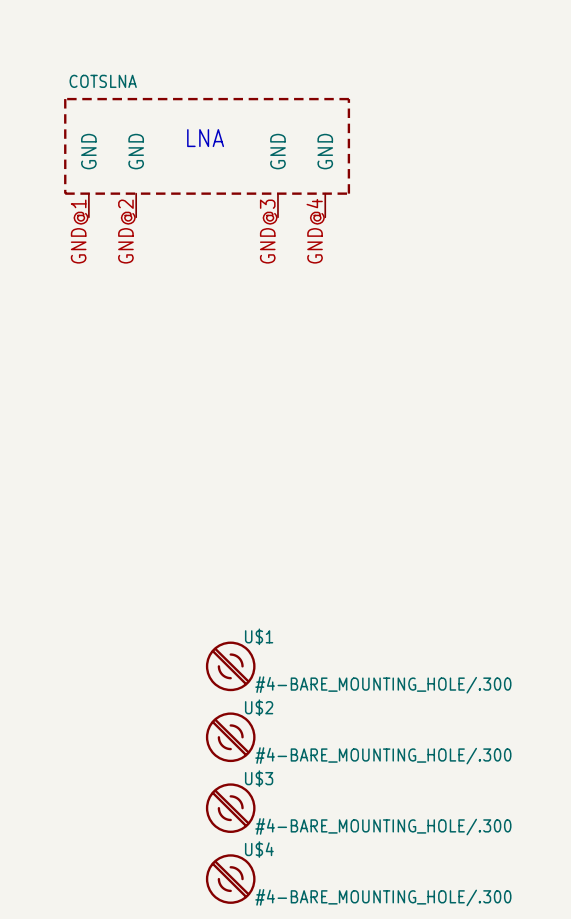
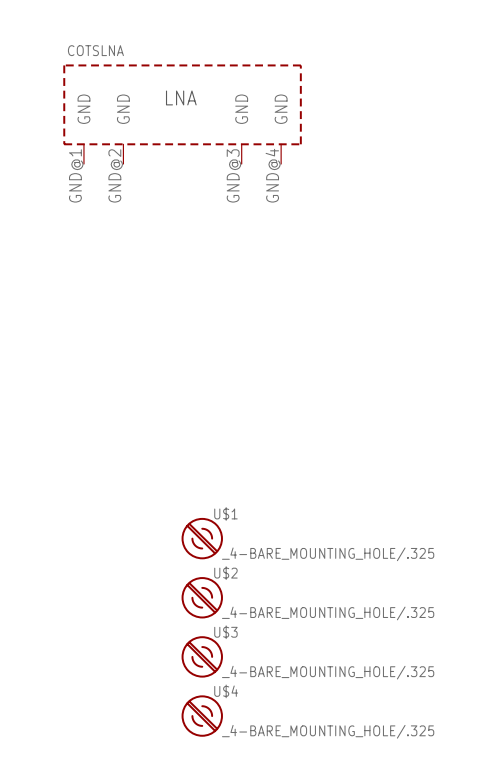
U$1 value: #4-BARE_MOUNTING_HOLE/.300 (383, 684) -> _4-BARE_MOUNTING_HOLE/.325 (328, 554)
U$2 value: #4-BARE_MOUNTING_HOLE/.300 (383, 755) -> _4-BARE_MOUNTING_HOLE/.325 (328, 613)
U$3 value: #4-BARE_MOUNTING_HOLE/.300 (383, 826) -> _4-BARE_MOUNTING_HOLE/.325 (328, 672)
U$4 value: #4-BARE_MOUNTING_HOLE/.300 (383, 897) -> _4-BARE_MOUNTING_HOLE/.325 (328, 731)

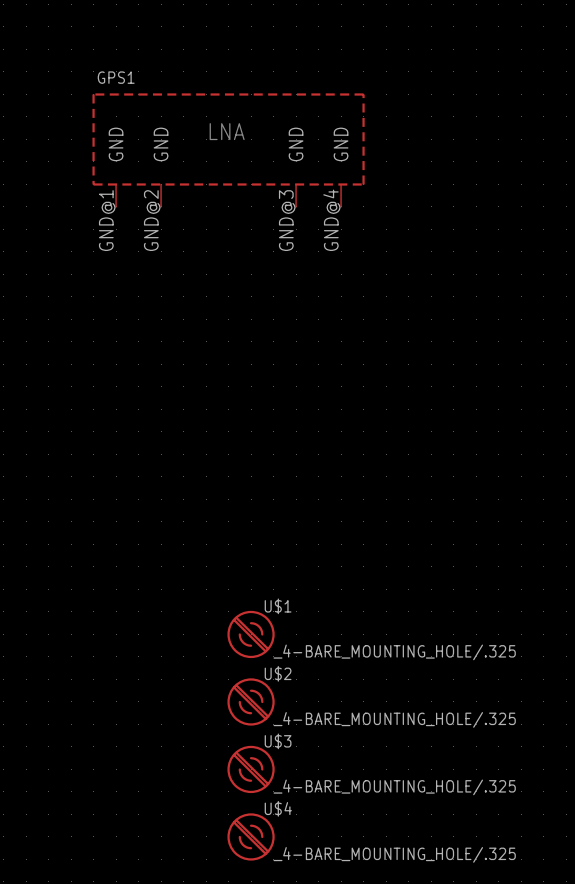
COTSLNA name: COTSLNA (95, 50) -> GPS1 (116, 77)

